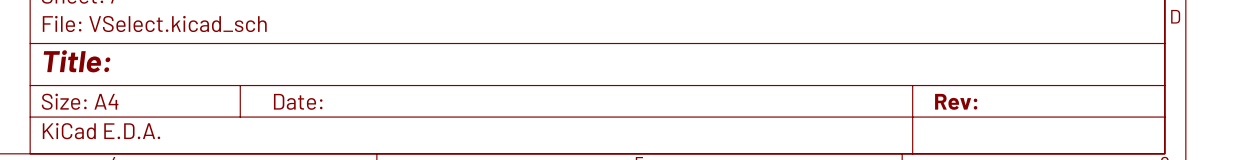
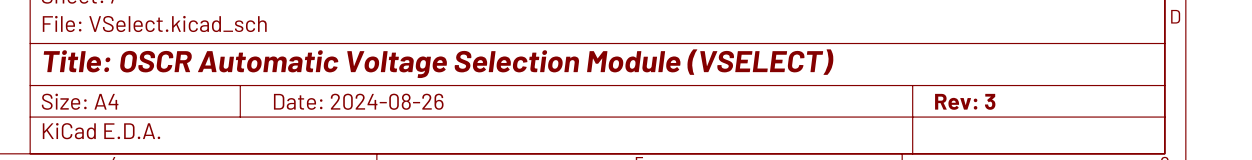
title block: Title: (77, 61) -> Title: OSCR Automatic Voltage Selection Module (VSELECT) (438, 63)
title block: Date: (298, 101) -> Date: 2024-08-26 (358, 101)
title block: Rev: (956, 101) -> Rev: 3 (965, 101)

